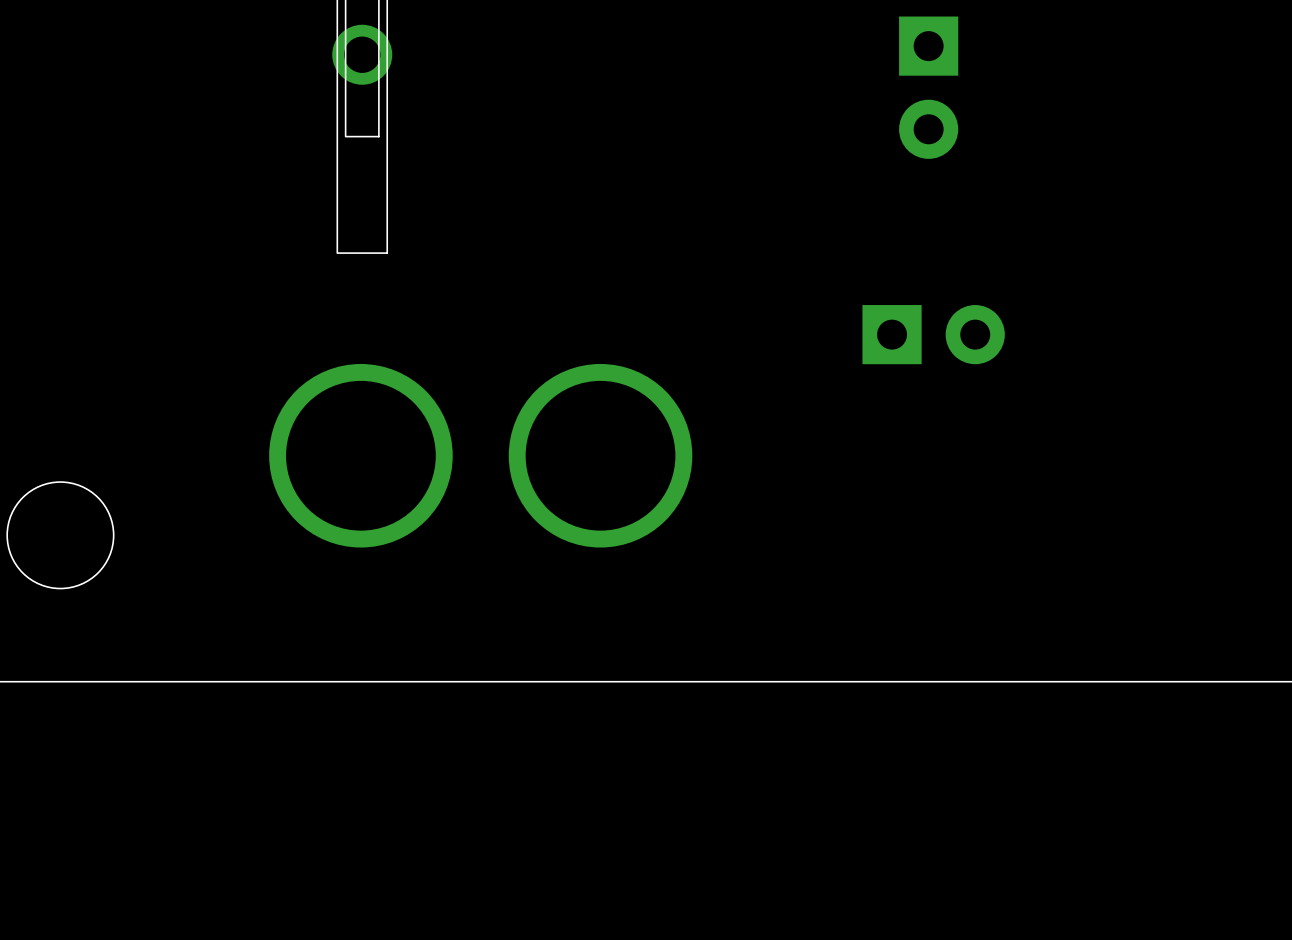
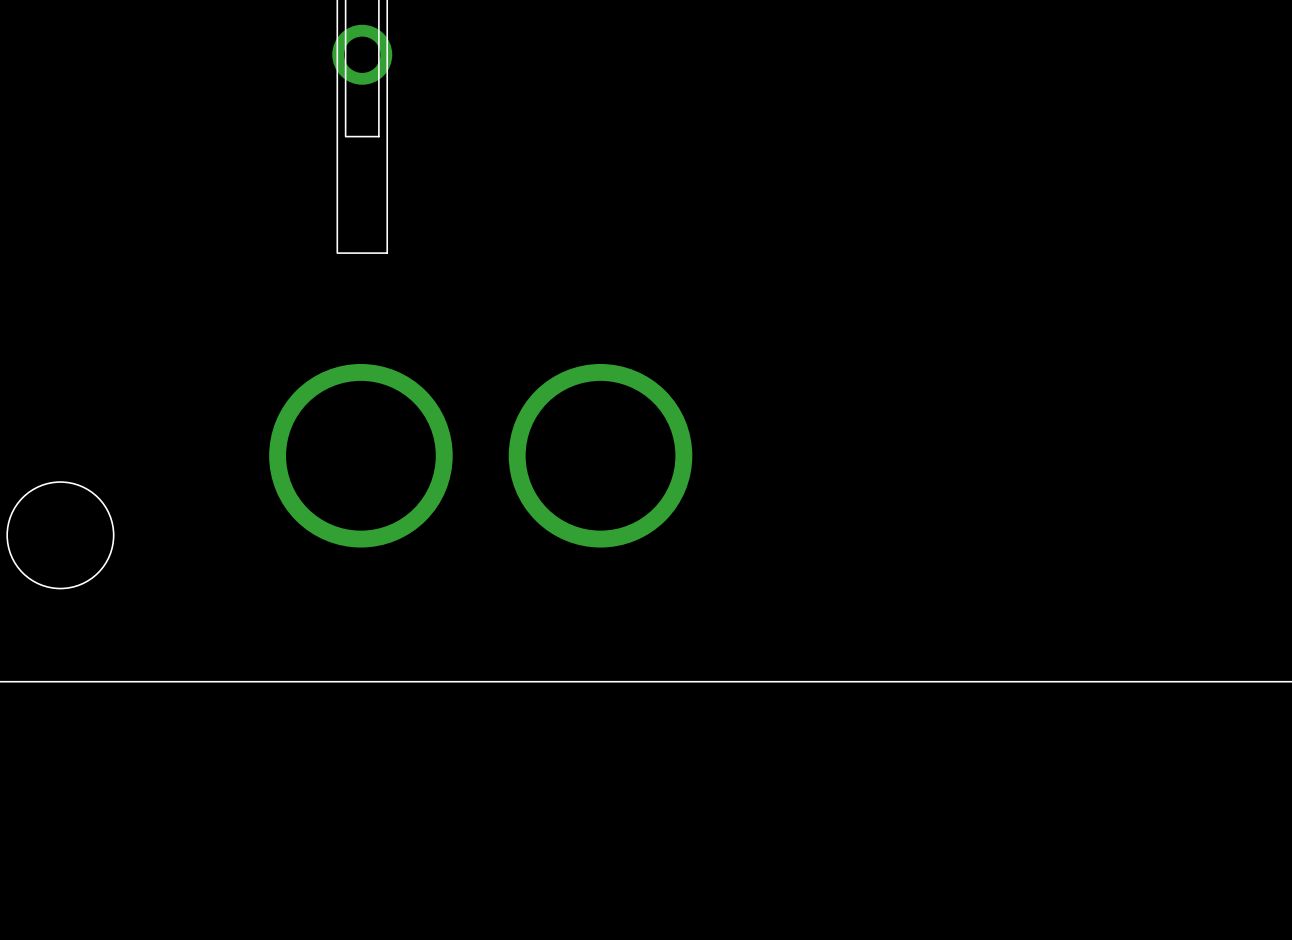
part: (928, 87) -> none
part: (933, 334) -> none

